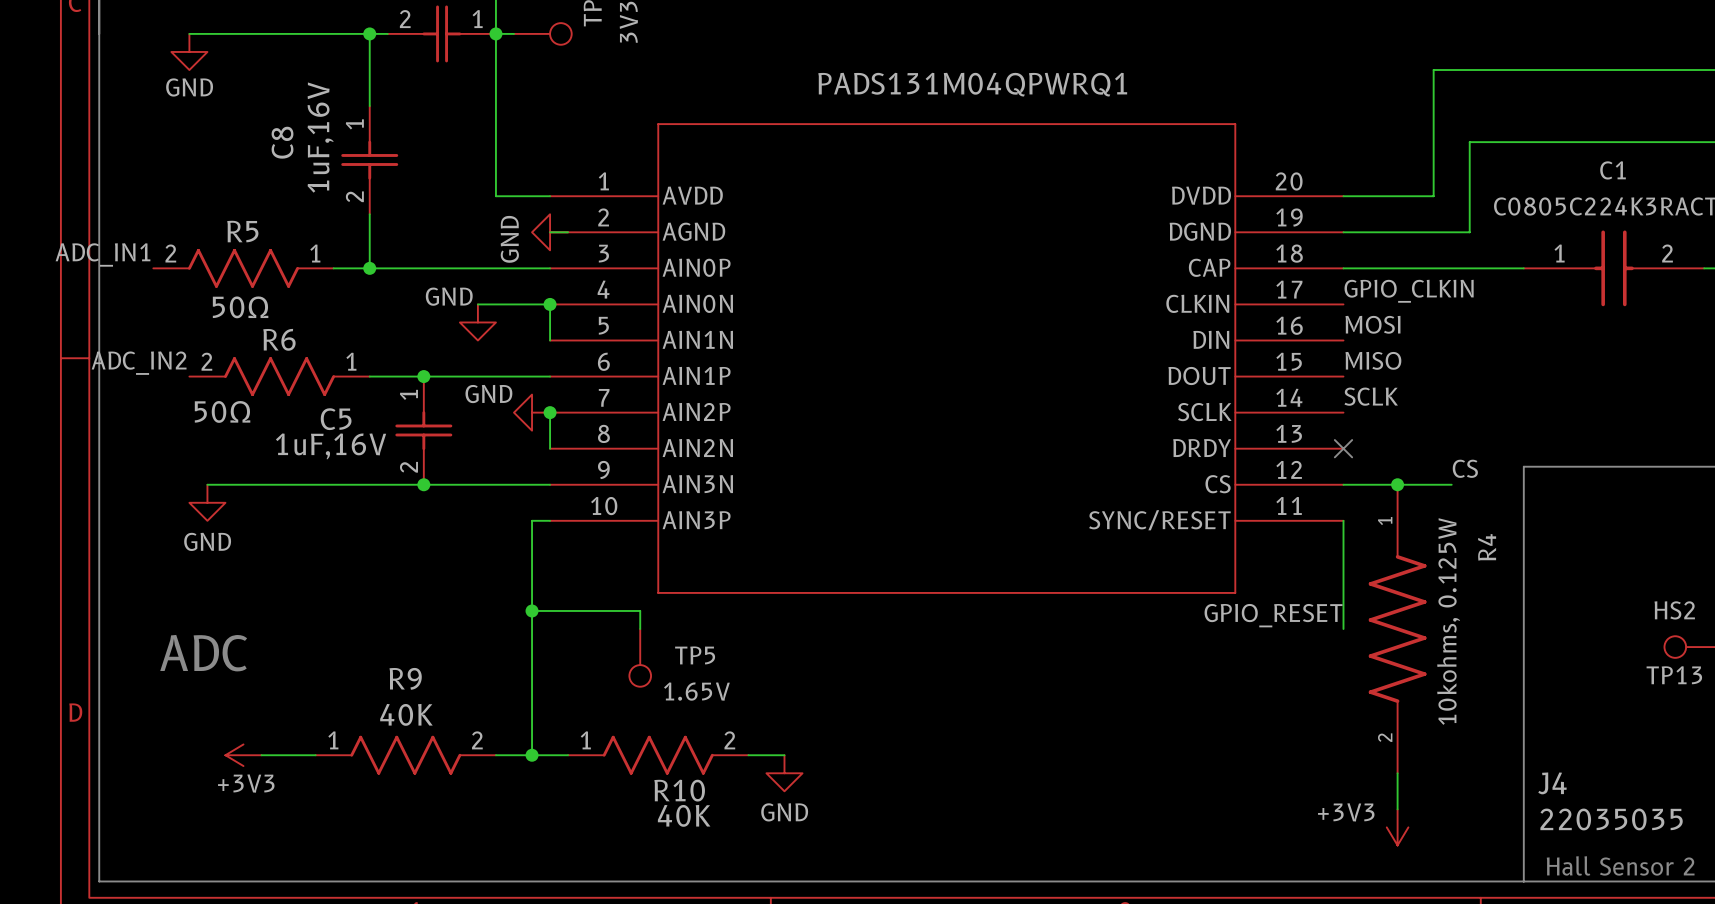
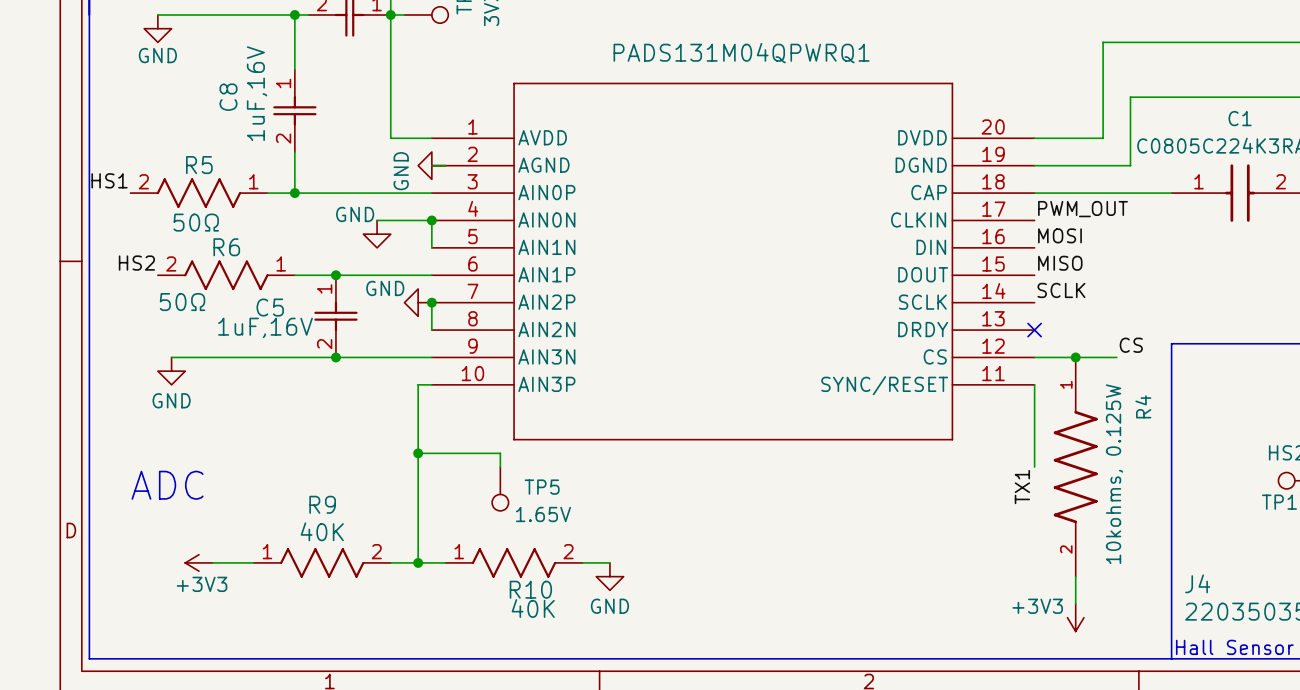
label: ADC_IN1 (102, 254) -> HS1 (109, 180)
label: GPIO_CLKIN (1409, 291) -> PWM_OUT (1082, 209)
label: ADC_IN2 (139, 363) -> HS2 (136, 263)
label: GPIO_RESET (1273, 615) -> TX1 (1022, 487)

